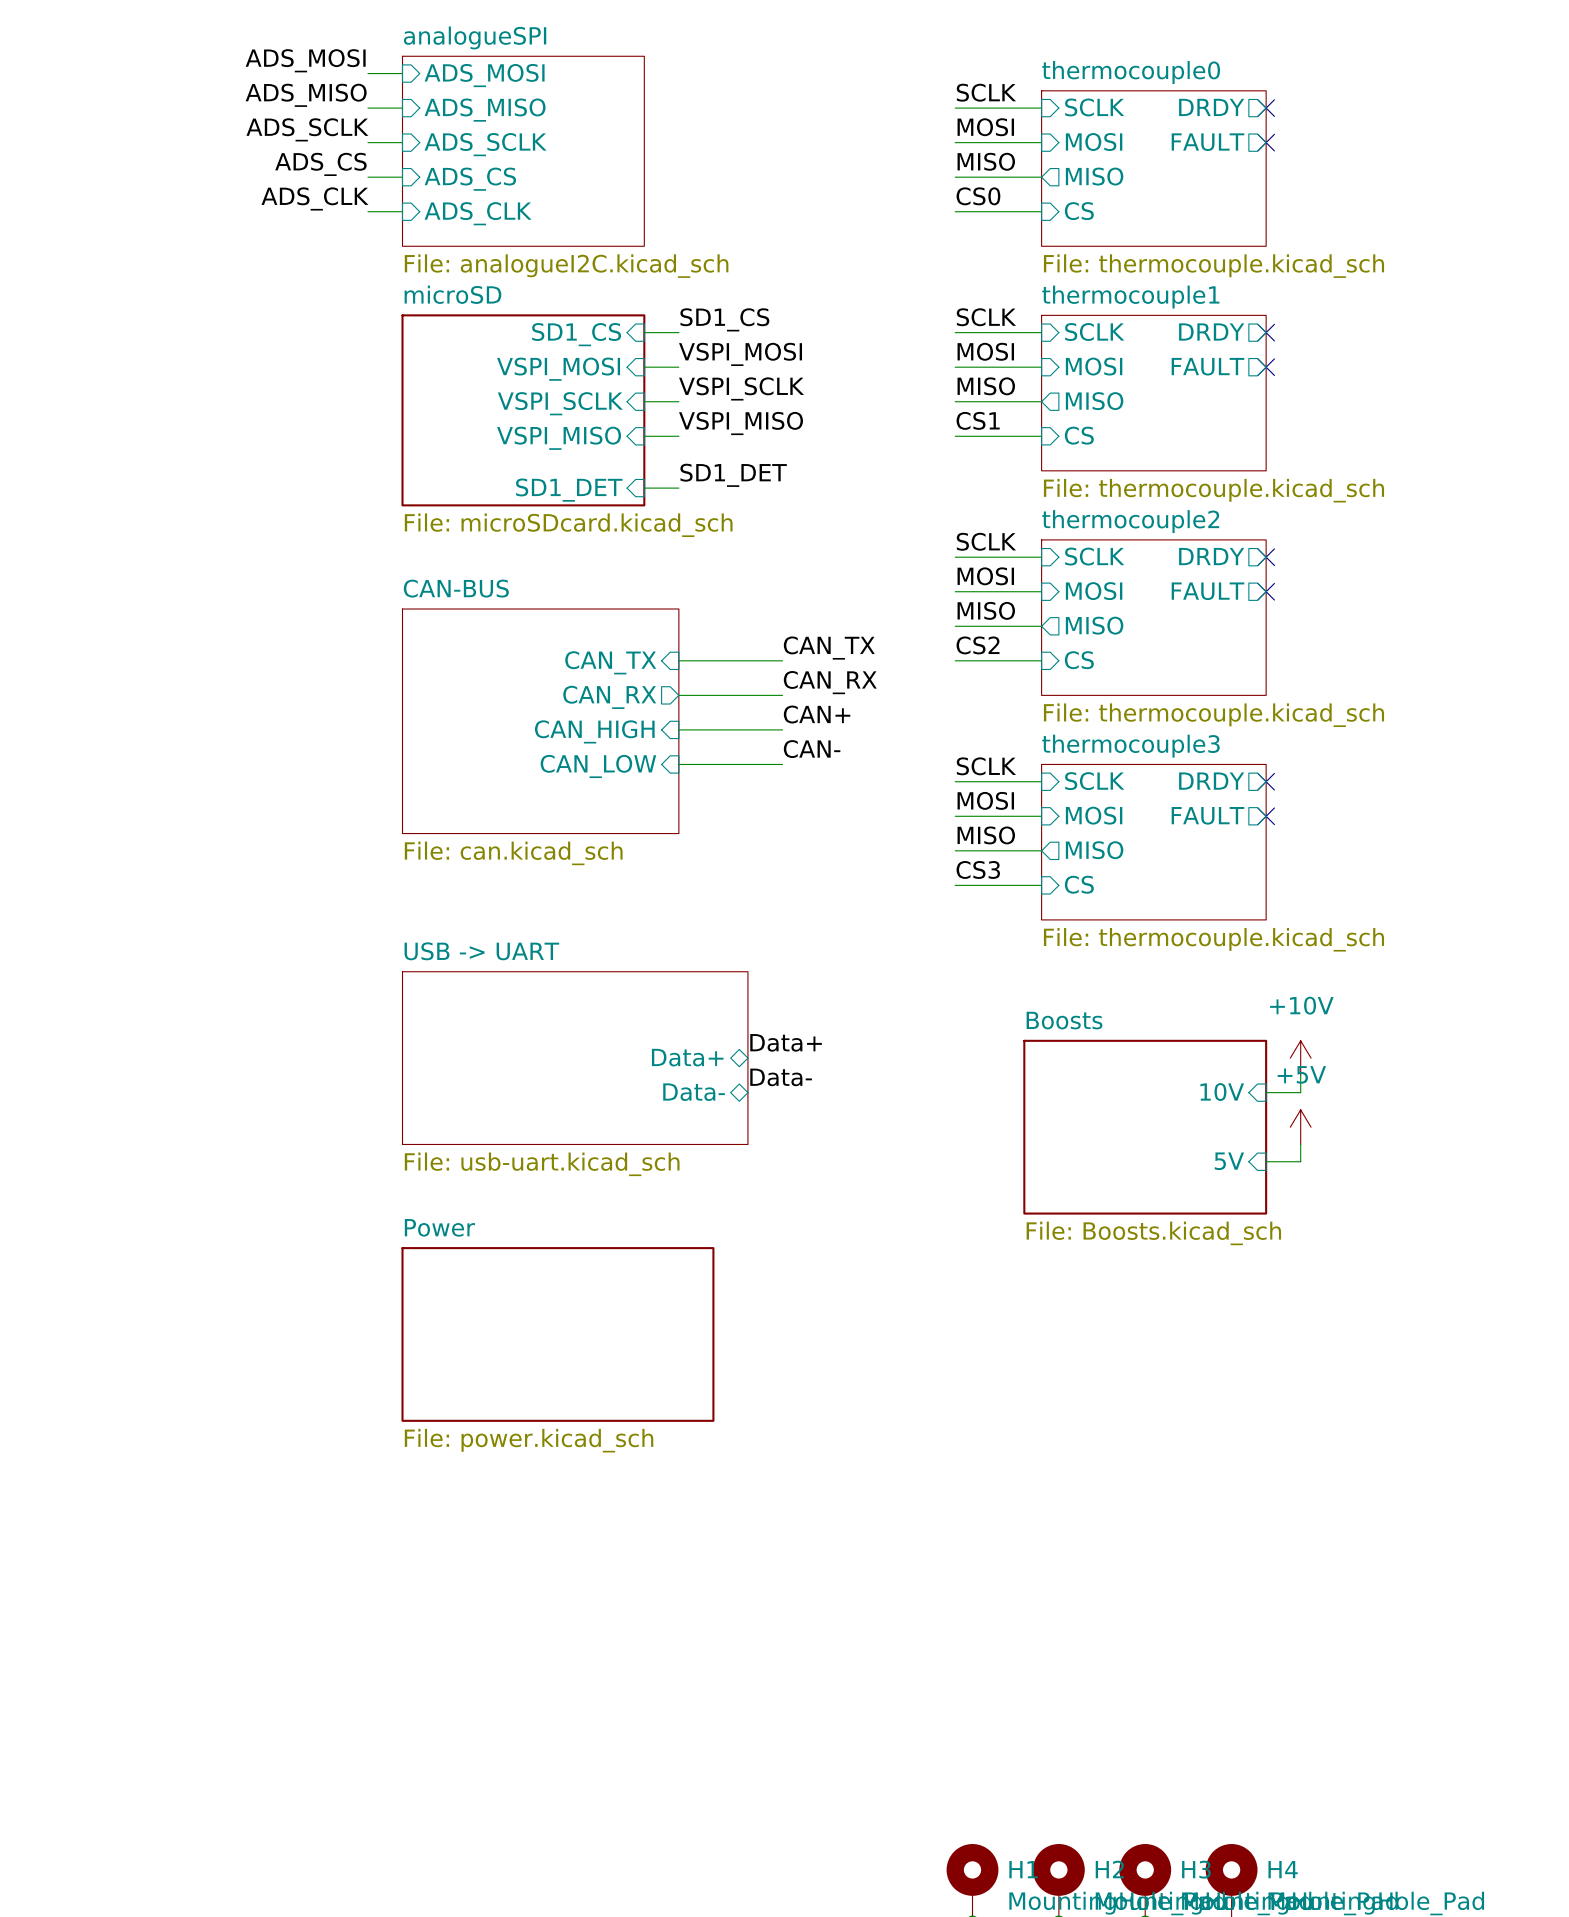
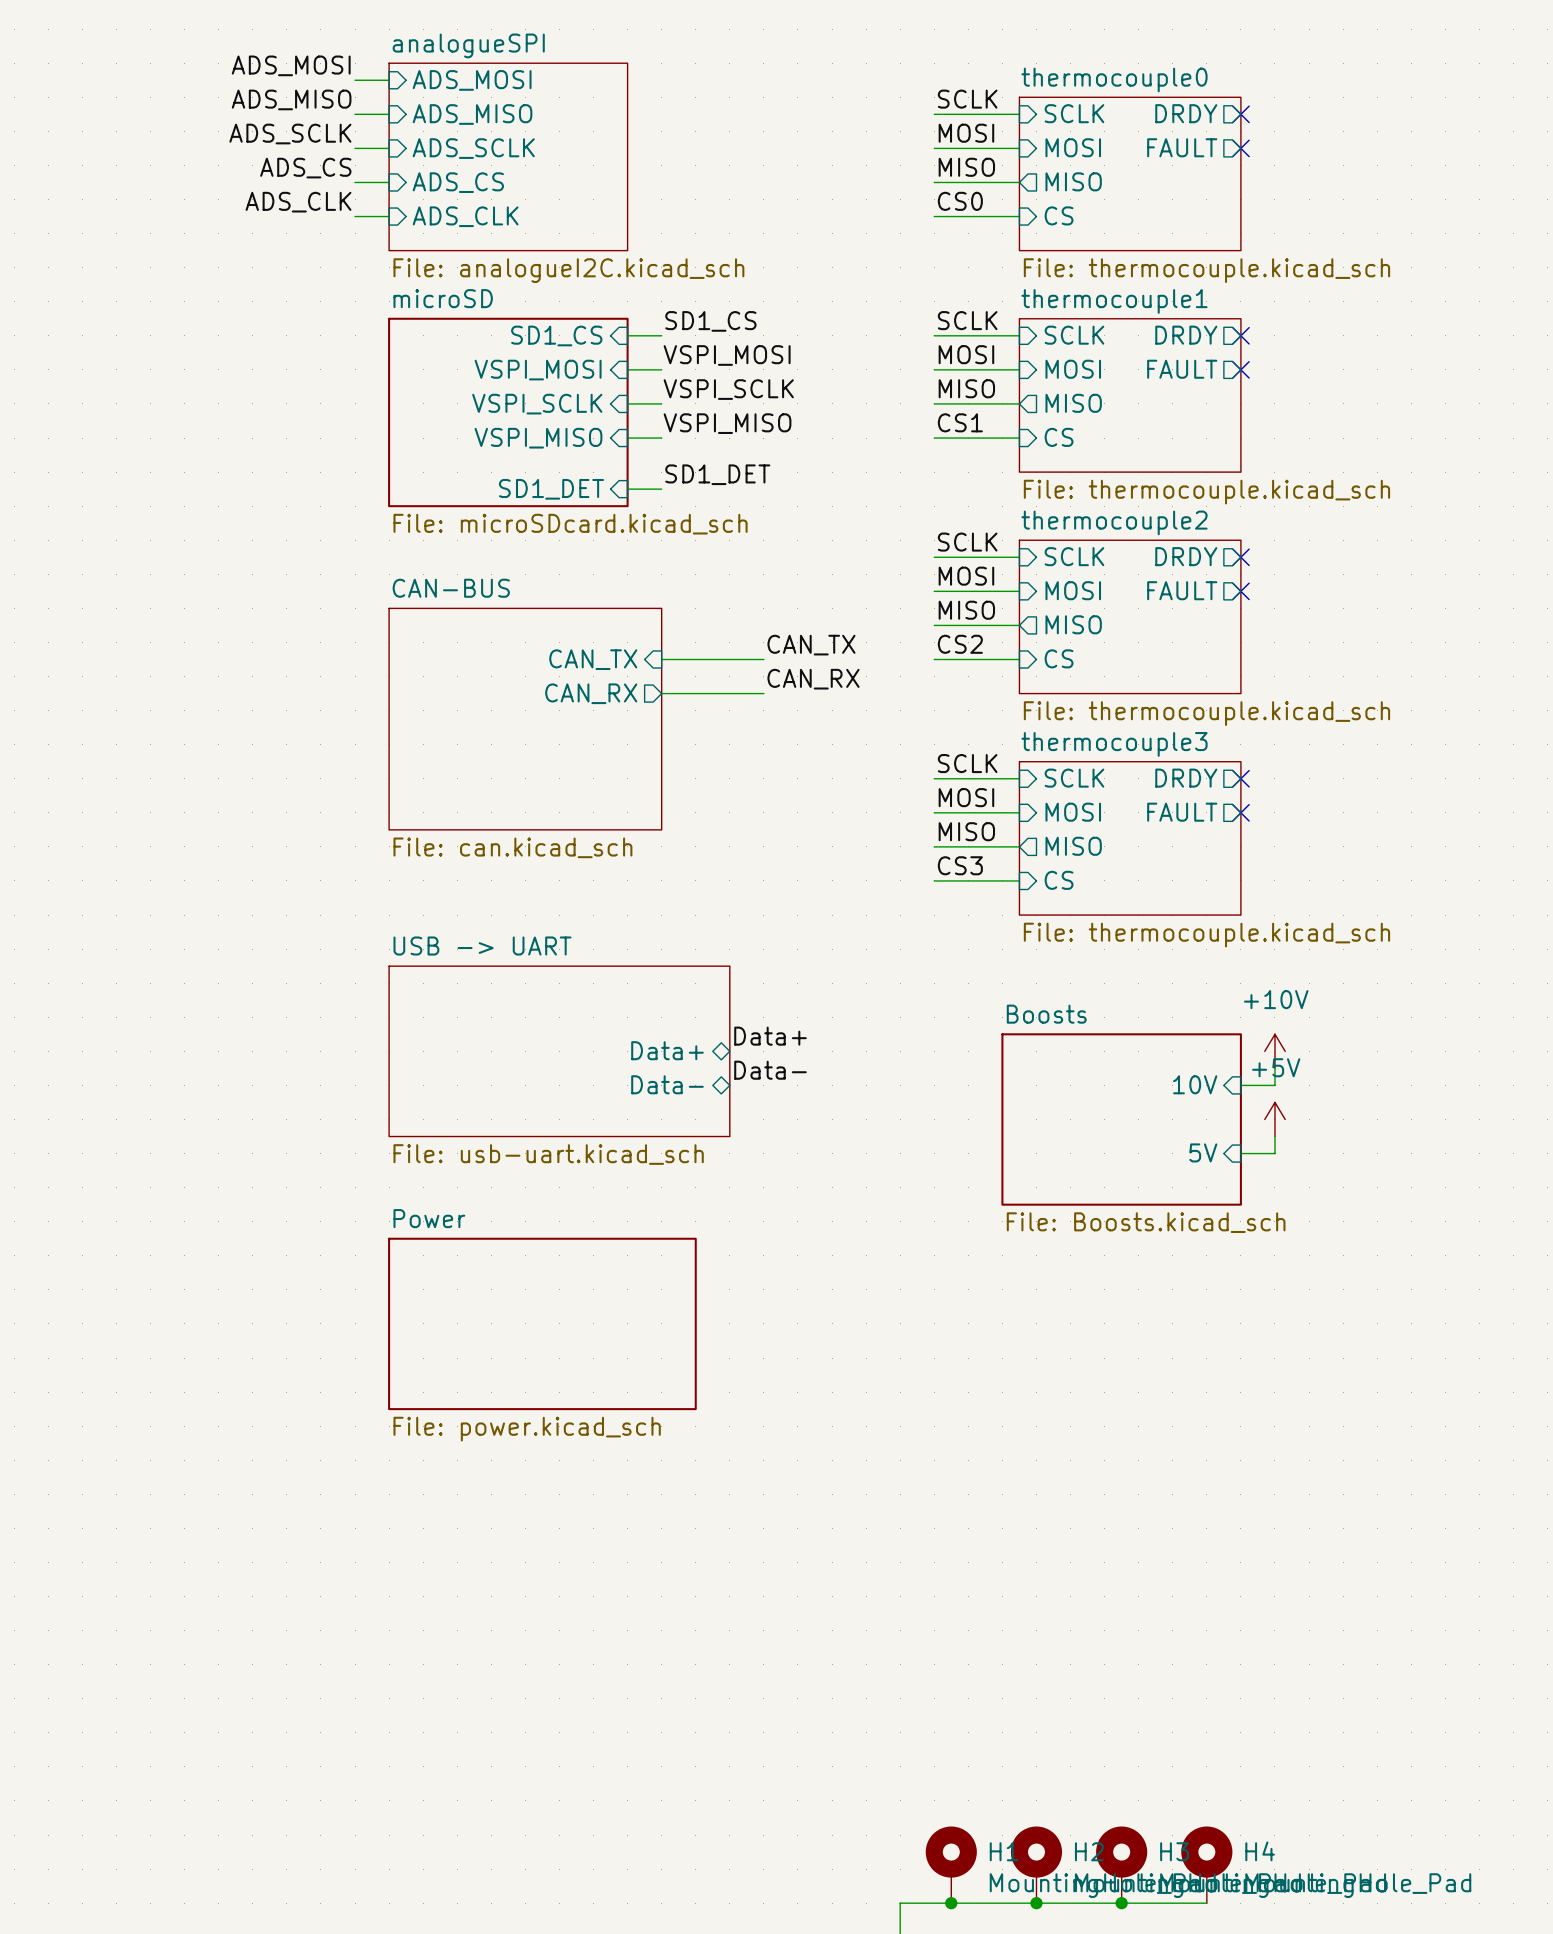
label: CAN+ (817, 714) -> none
wire: (678, 729) (782, 729) -> none
sheet pin: CAN_HIGH (594, 731) -> none
label: CAN- (812, 749) -> none
wire: (678, 764) (782, 764) -> none
sheet pin: CAN_LOW (598, 766) -> none

